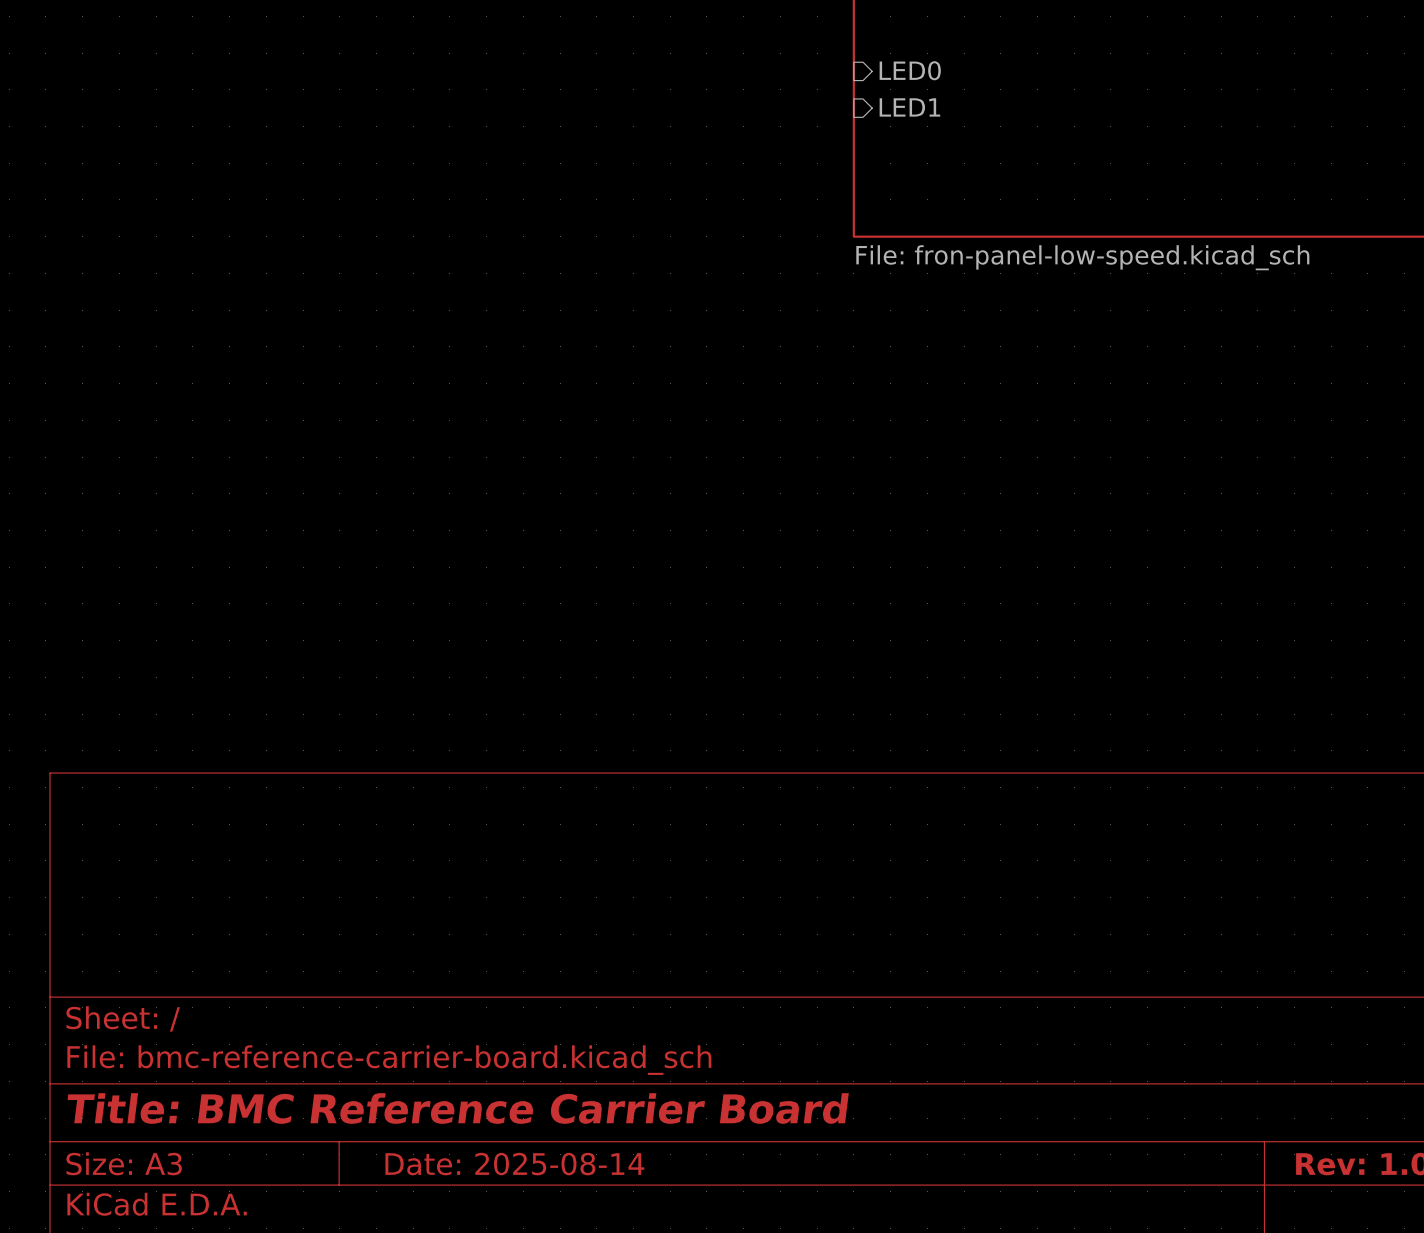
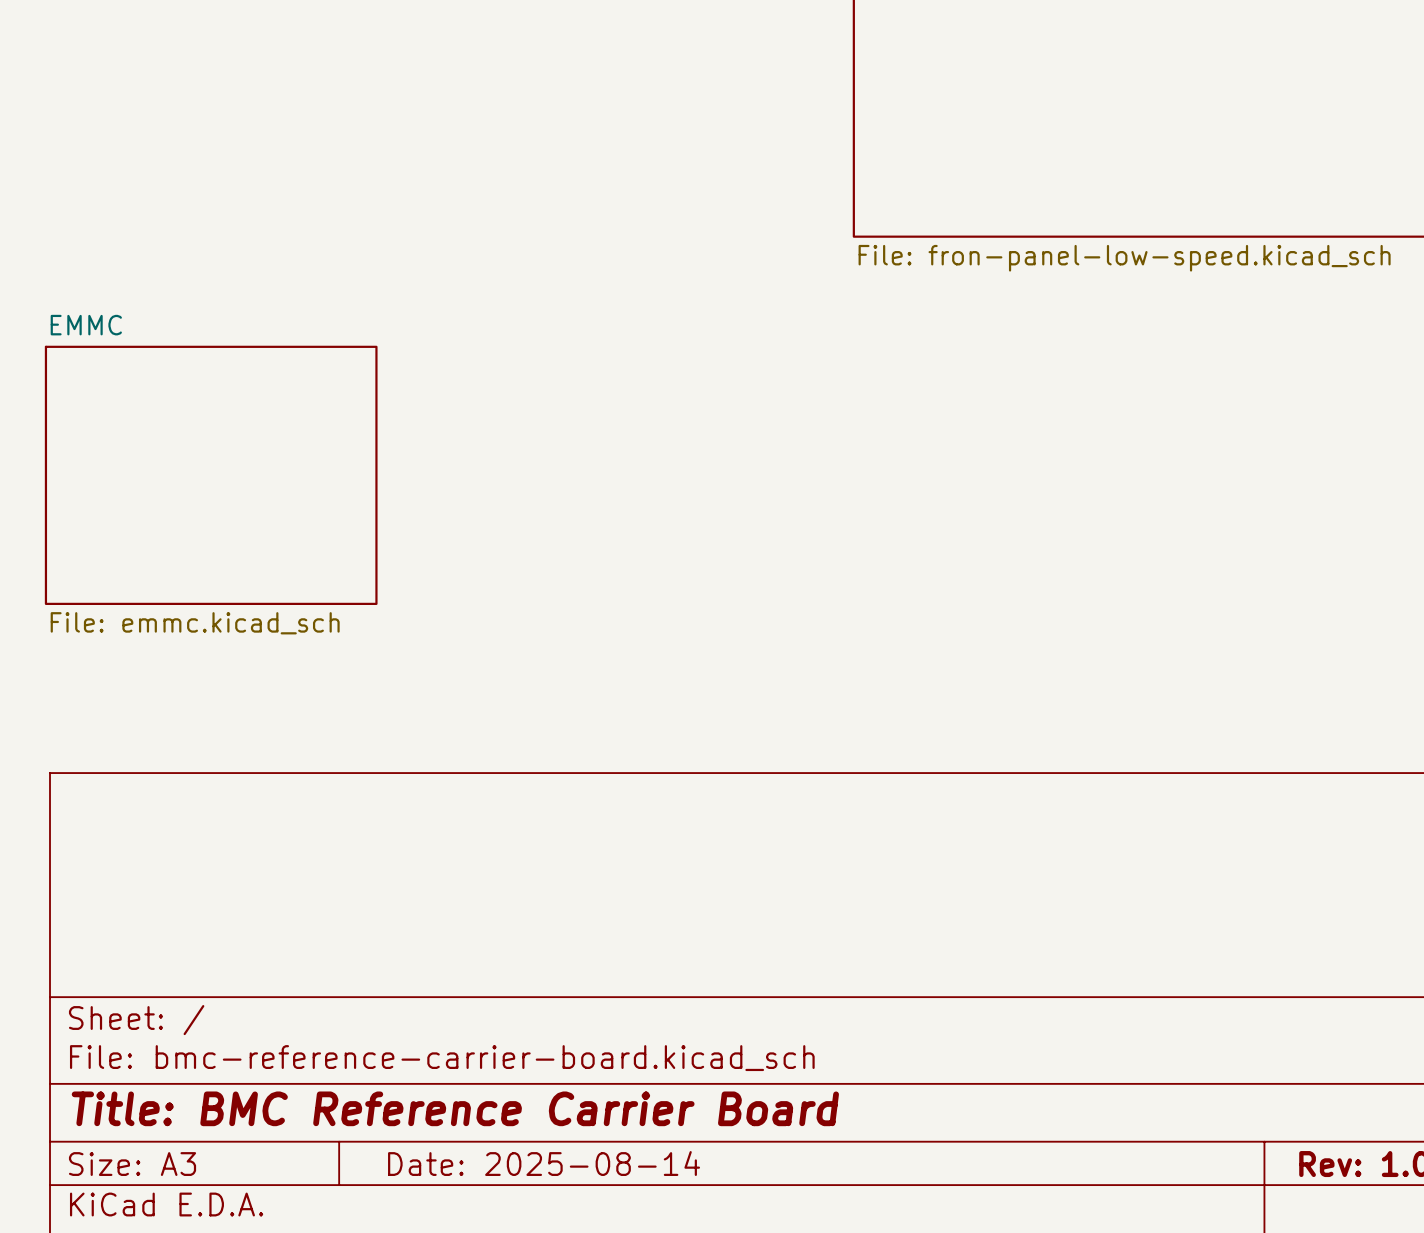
sheet pin: LED0 (910, 70) -> none
sheet pin: LED1 (909, 107) -> none
sheet EMMC: none -> File: emmc.kicad_sch (211, 475)

